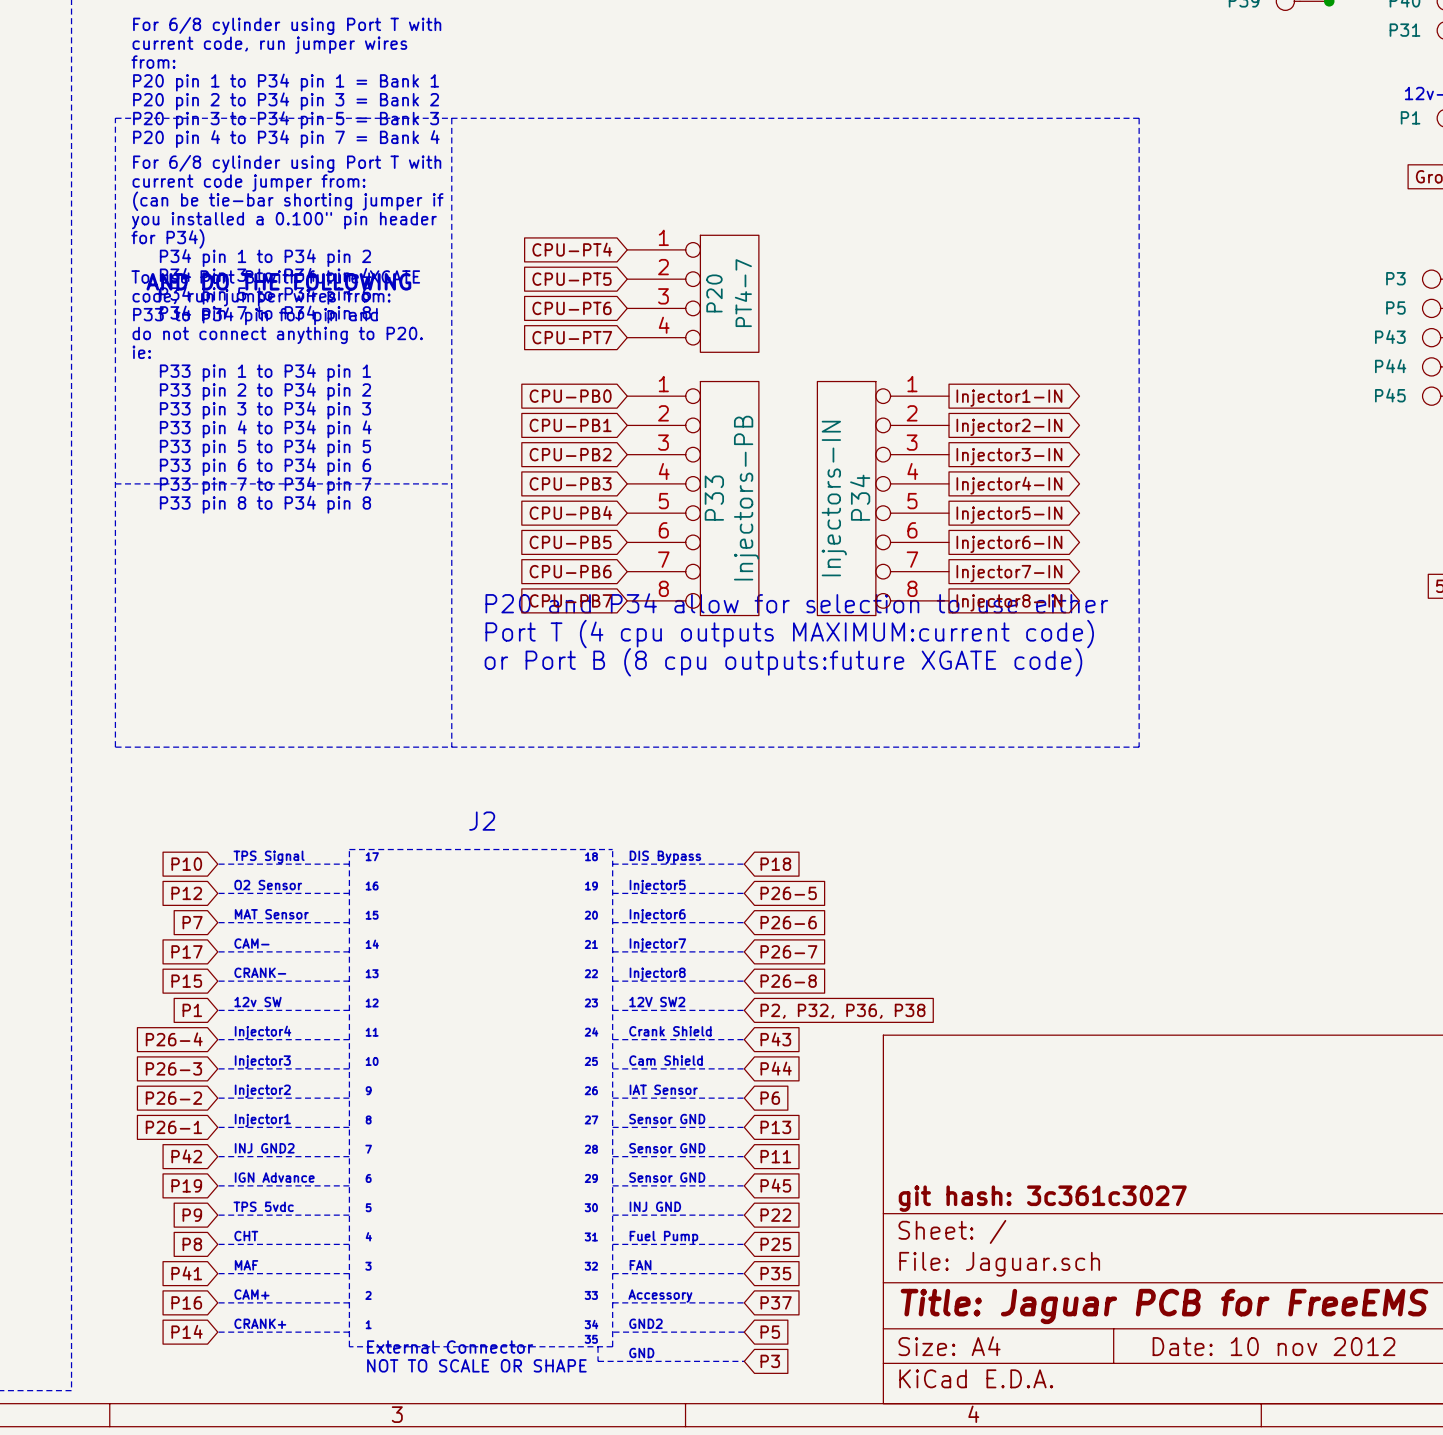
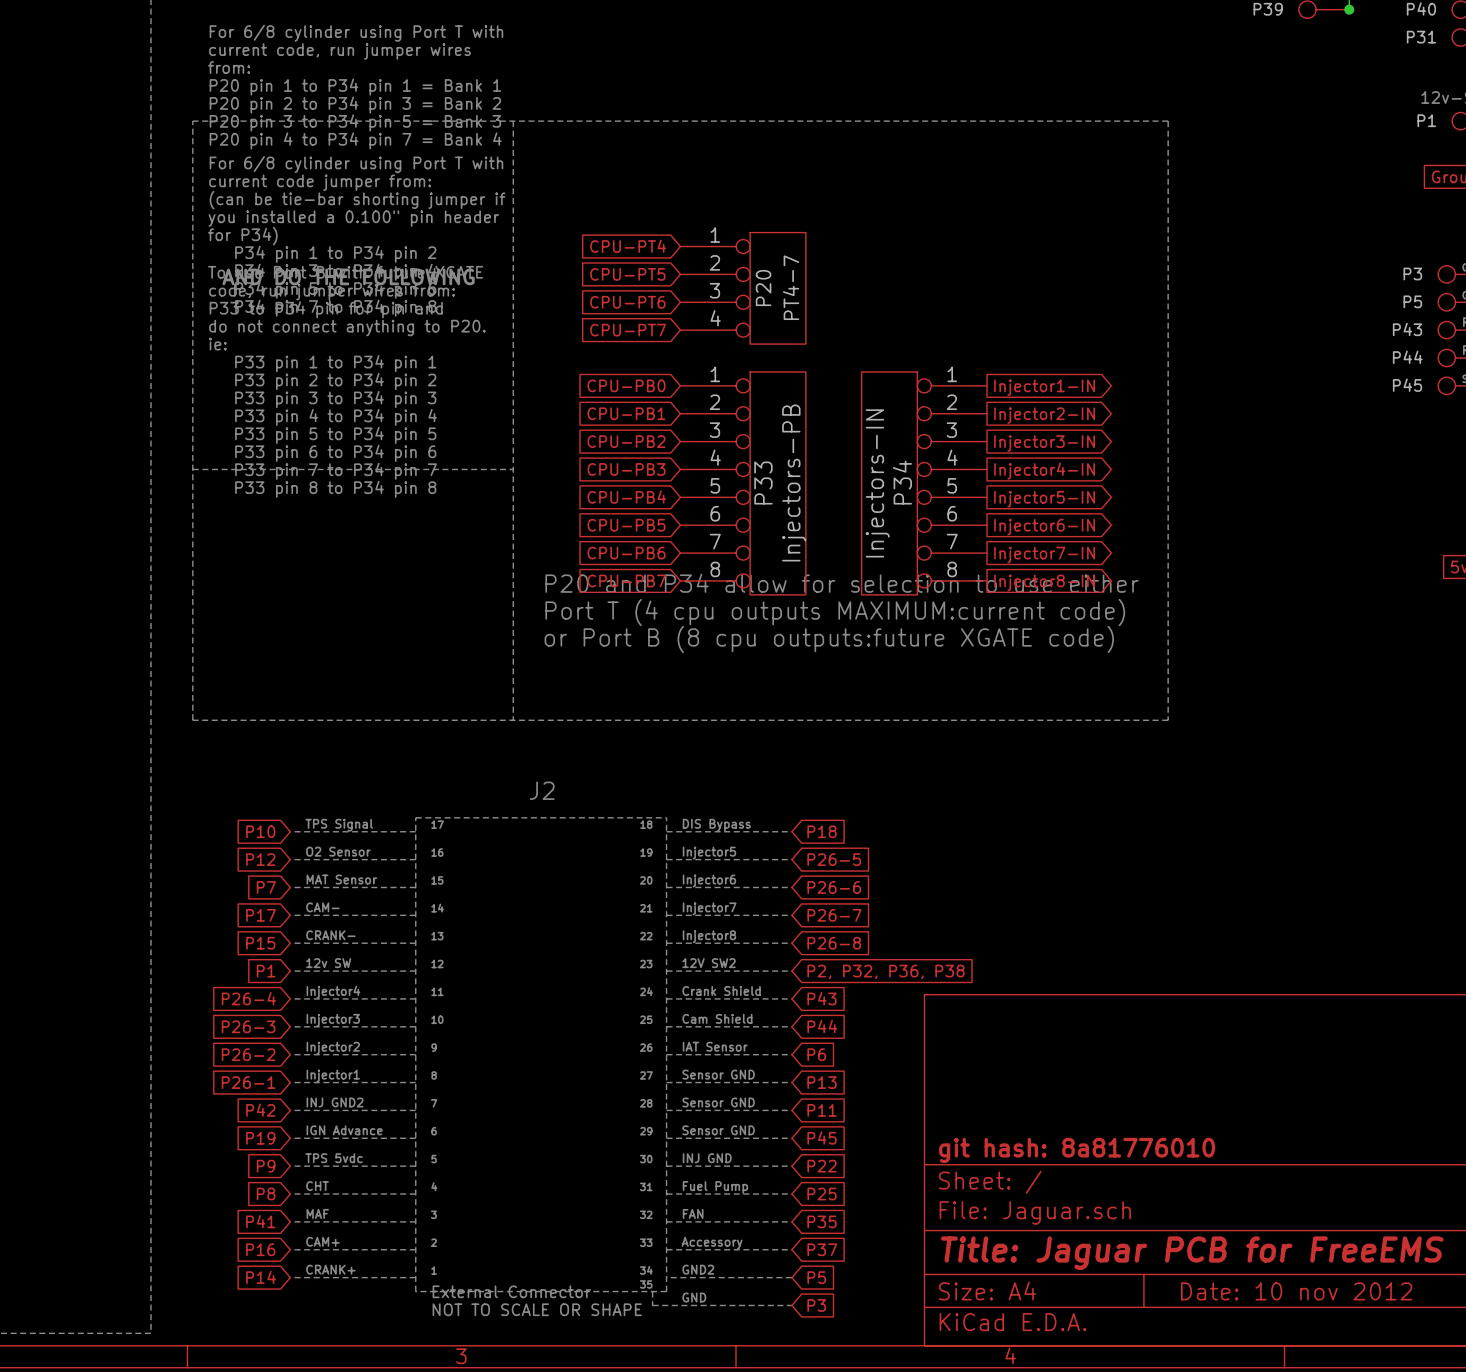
title block: git hash: 3c361c3027 (1042, 1198) -> git hash: 8a81776010 (1077, 1150)

